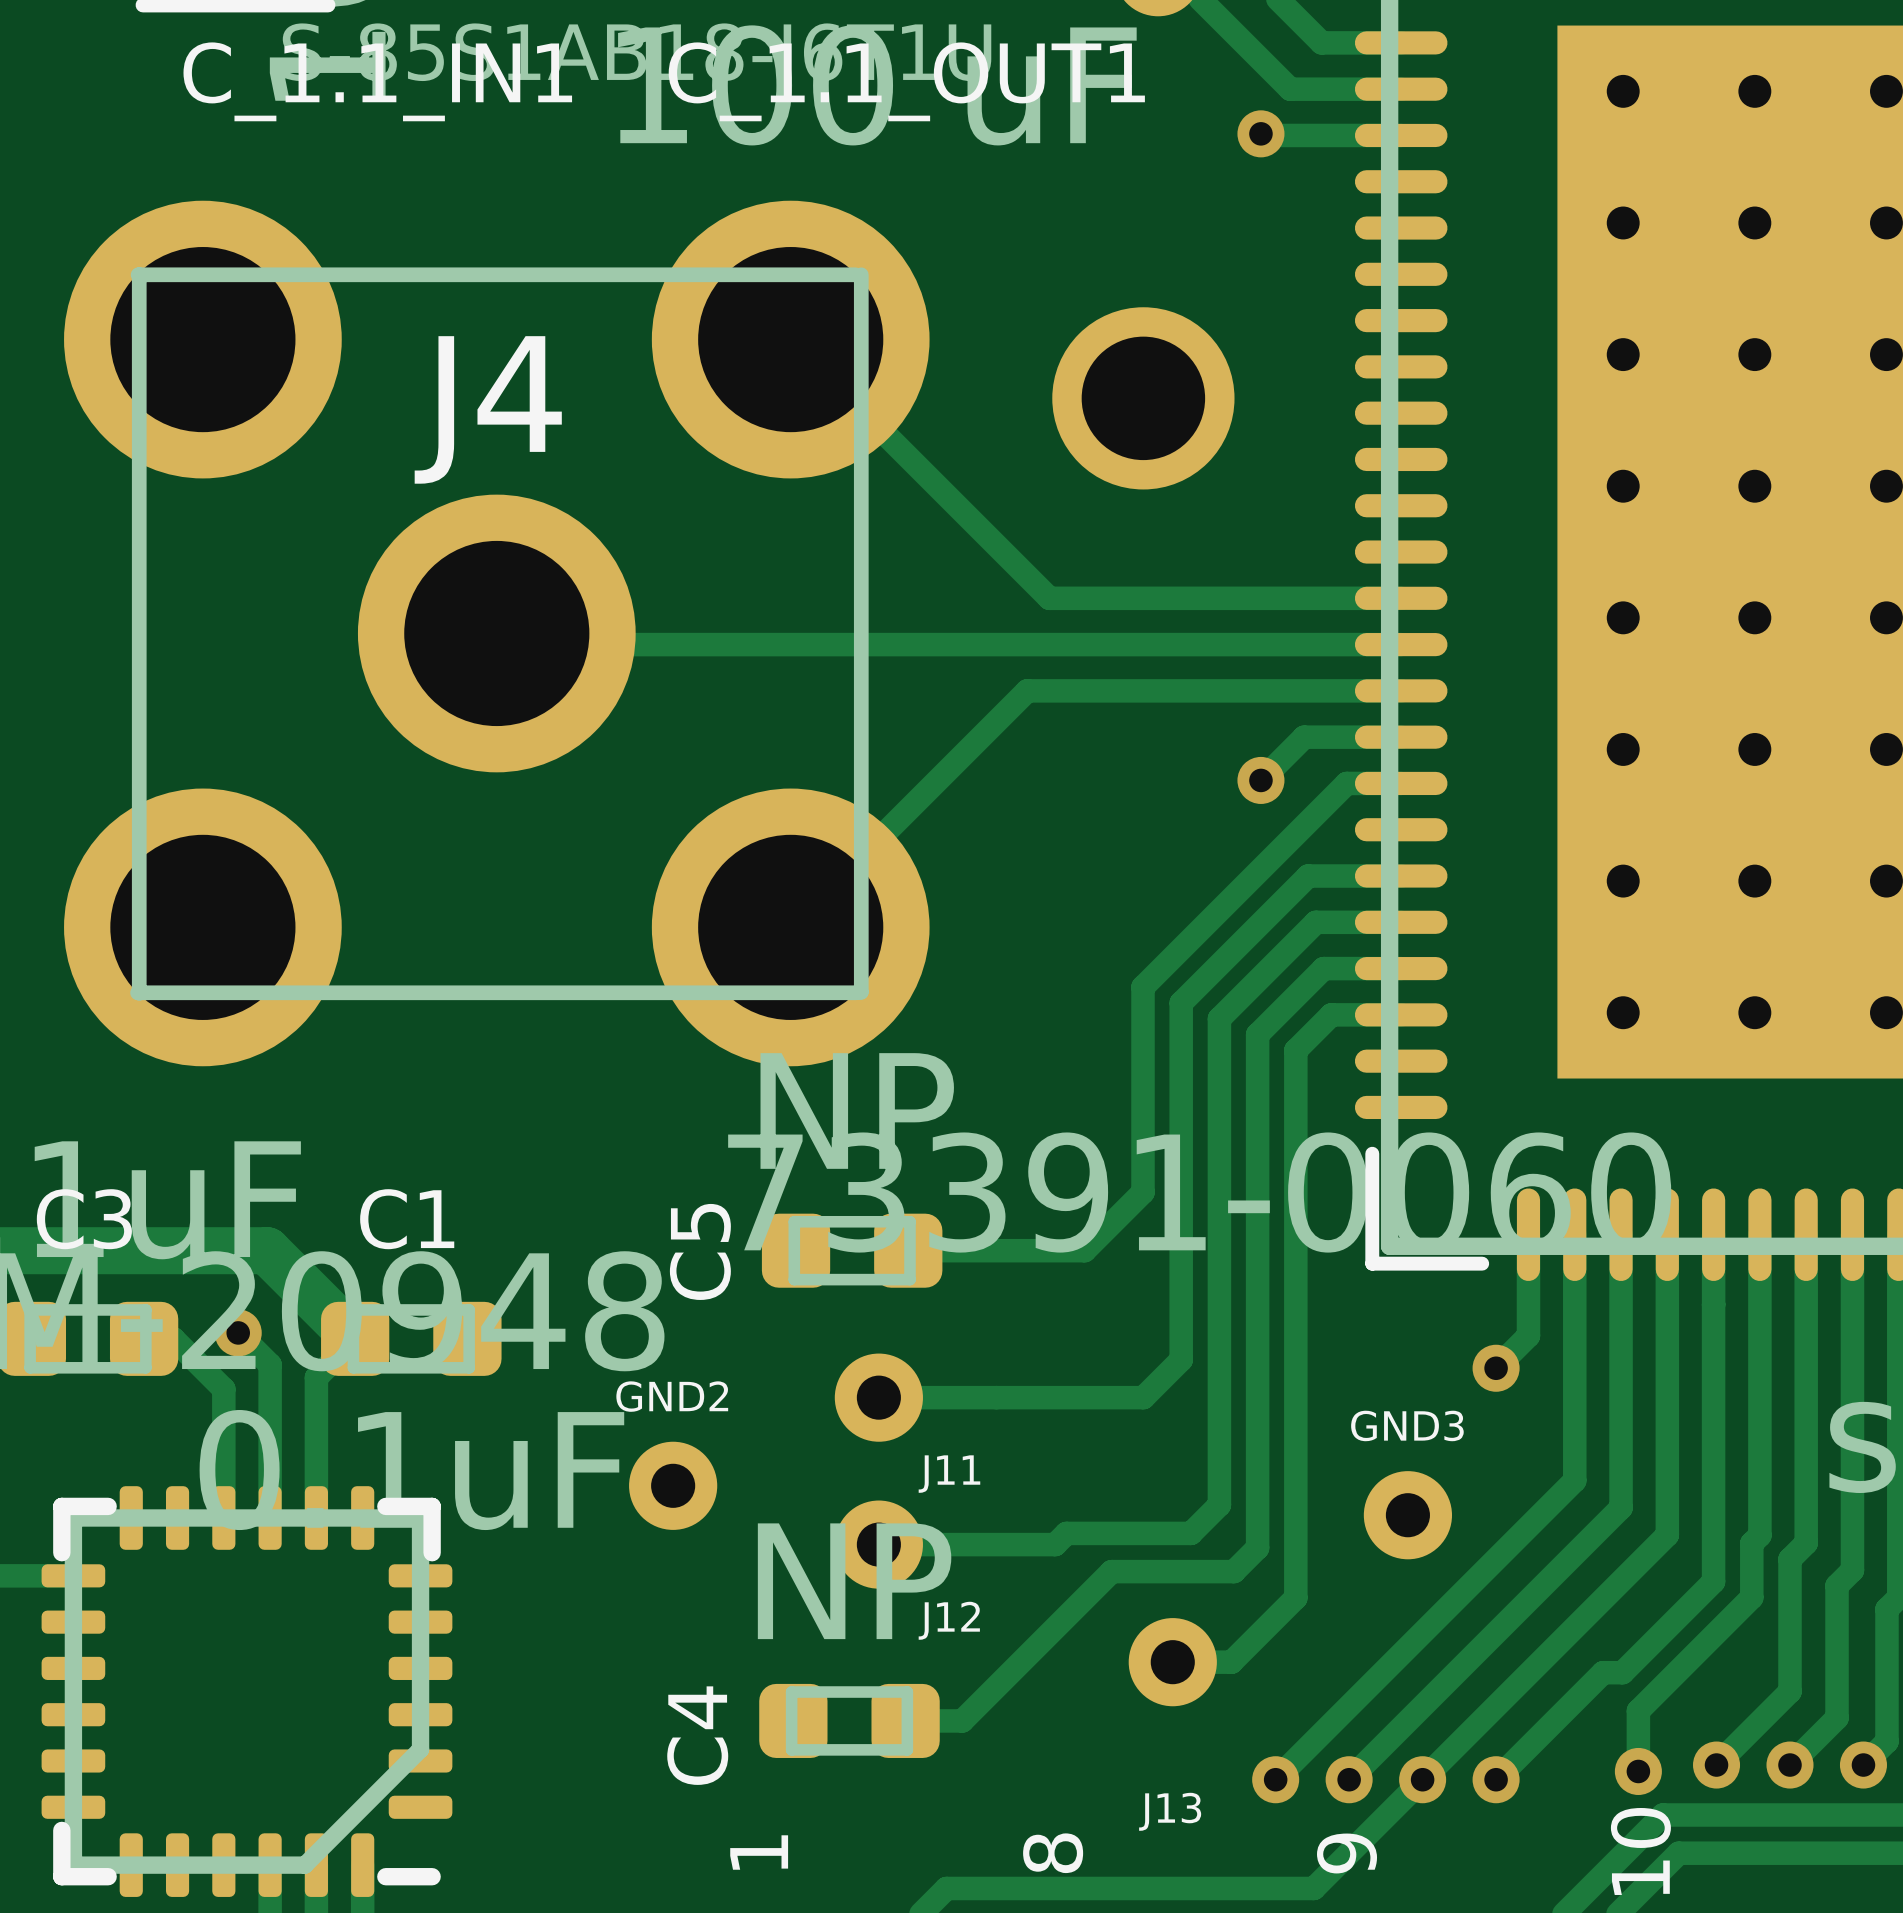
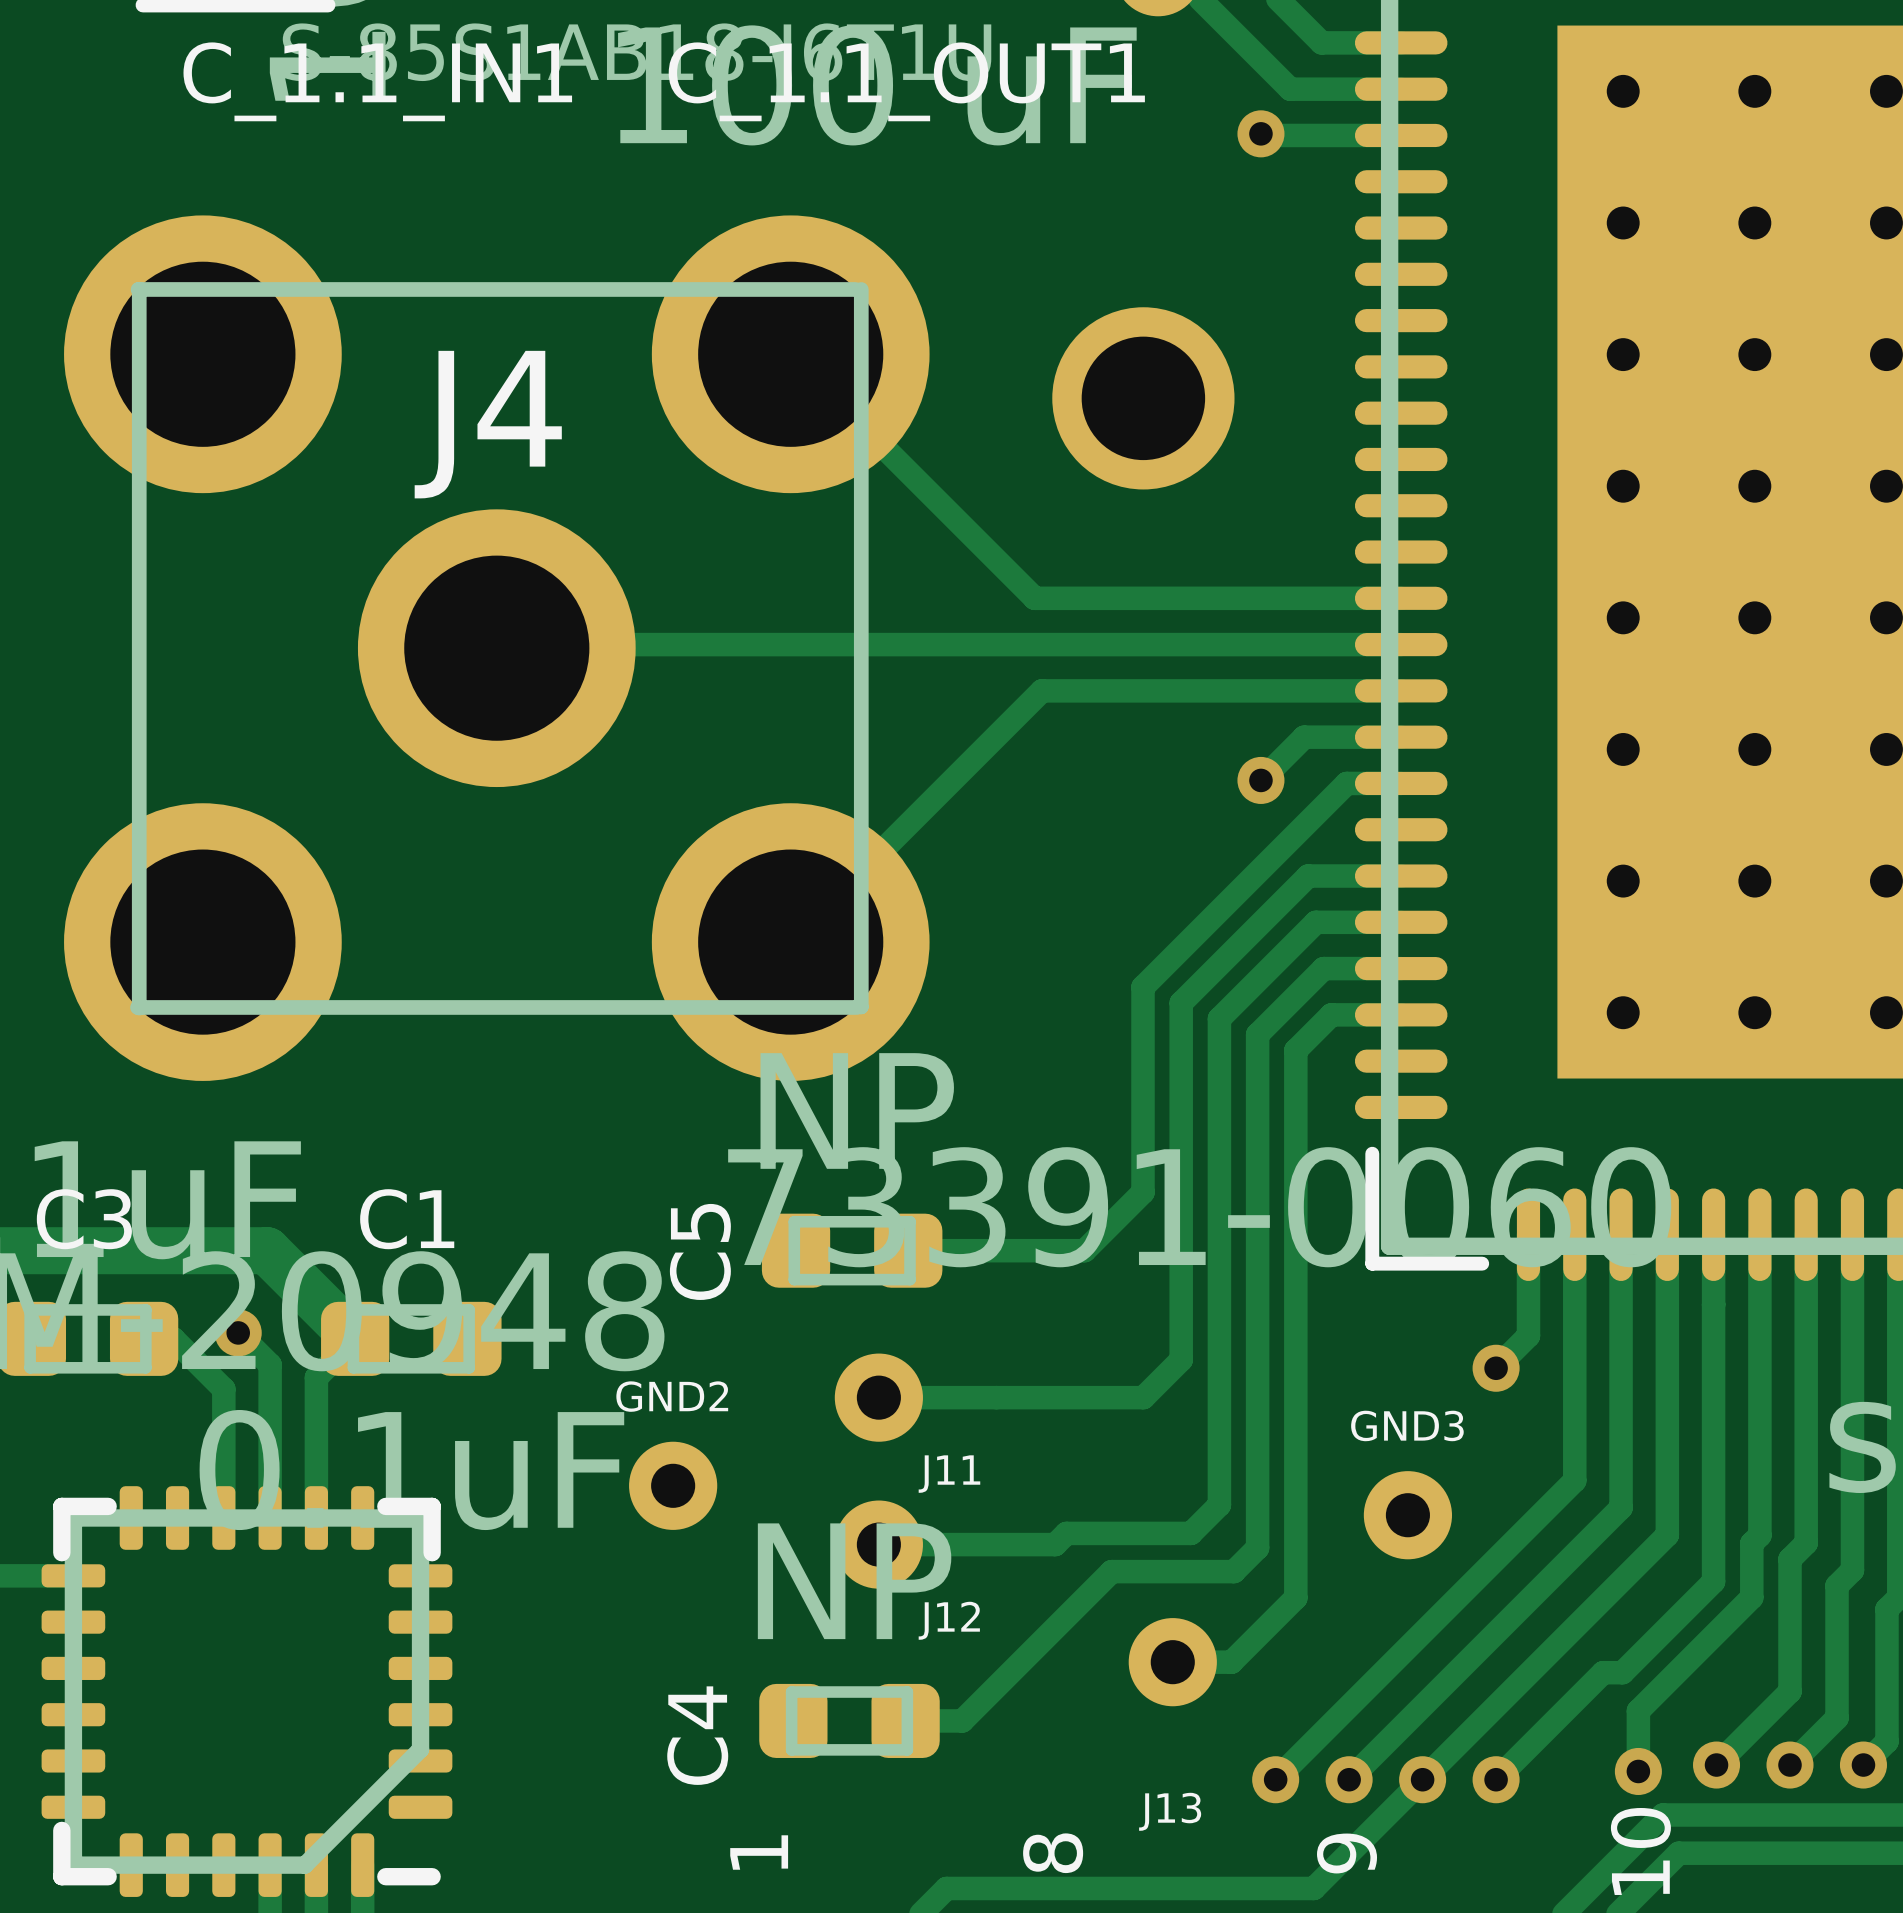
track: (790, 339) (1049, 598) -> (790, 354) (1034, 598) (1049, 598)
J4 position: (496, 633) -> (496, 648)
track: (1041, 690) (1027, 690) (790, 927) -> (1041, 690) (790, 942)

